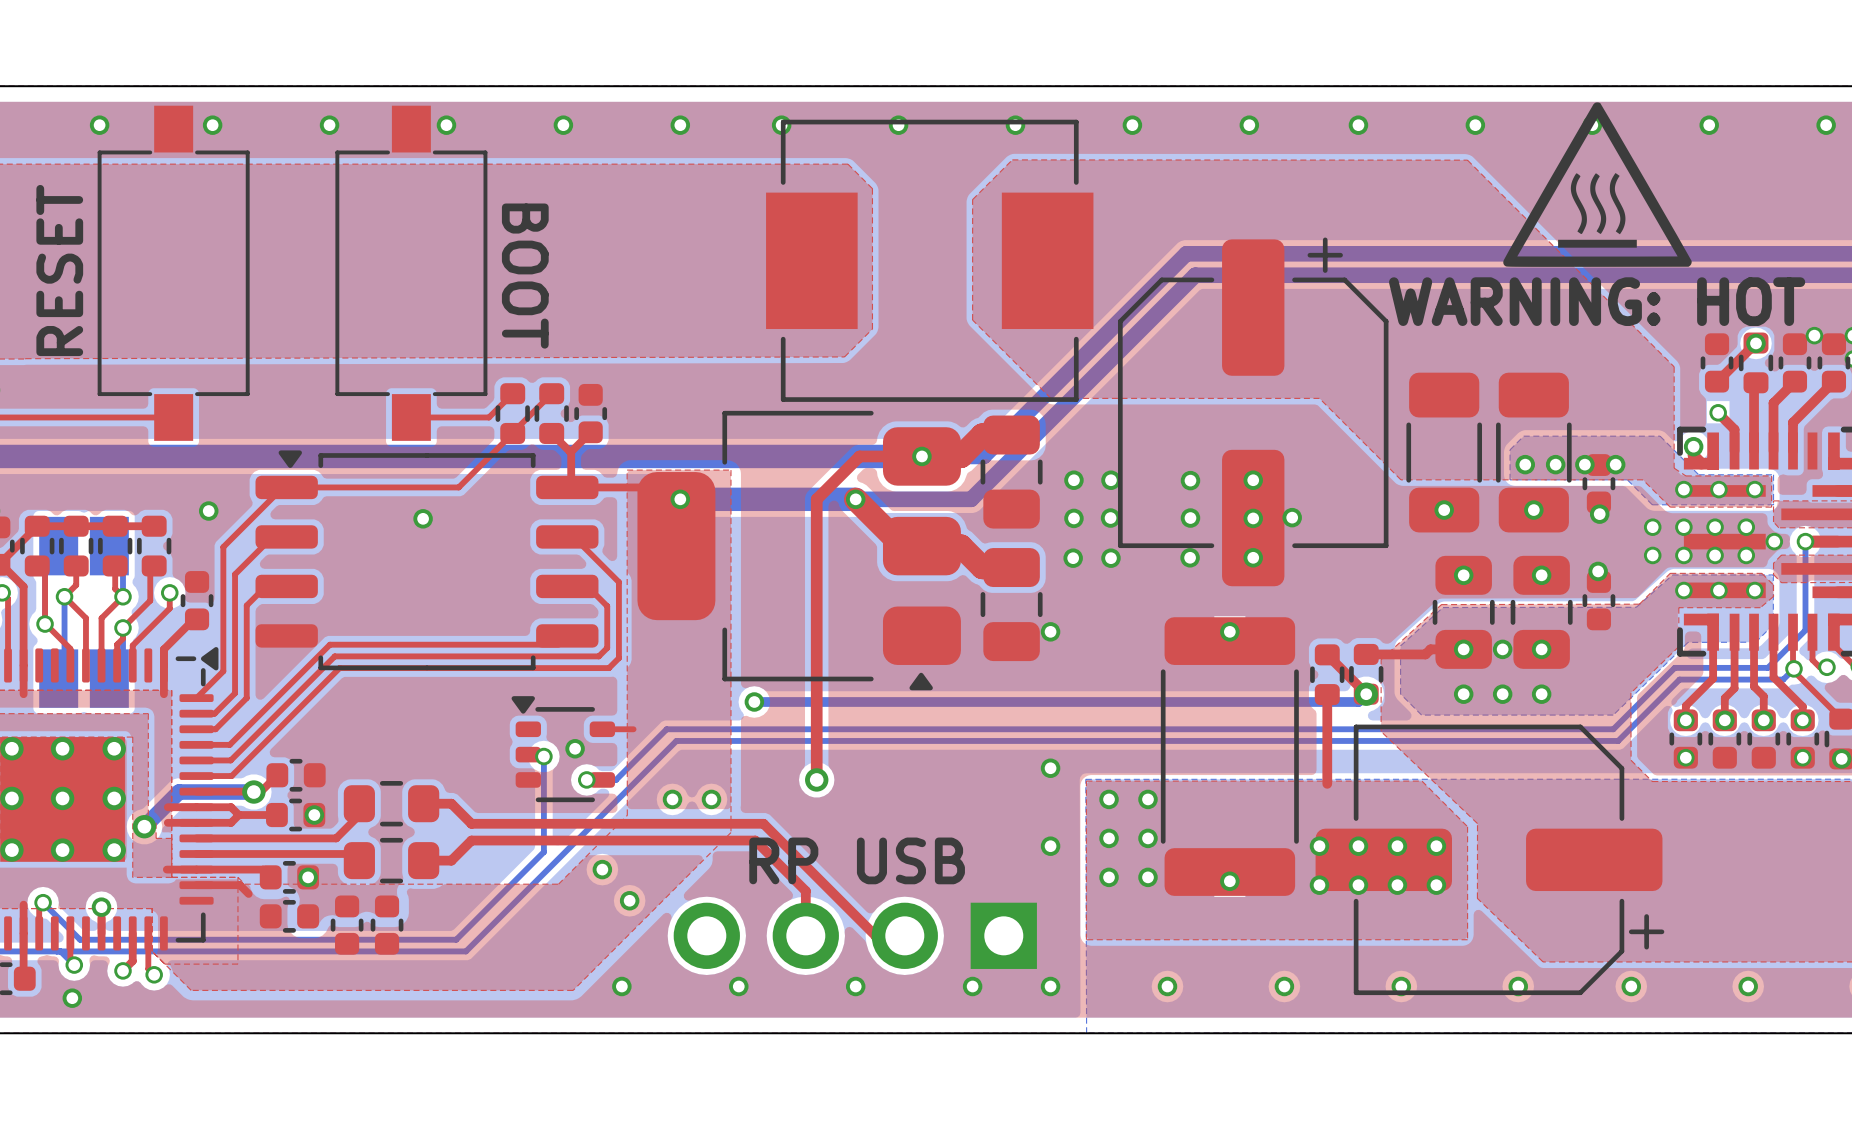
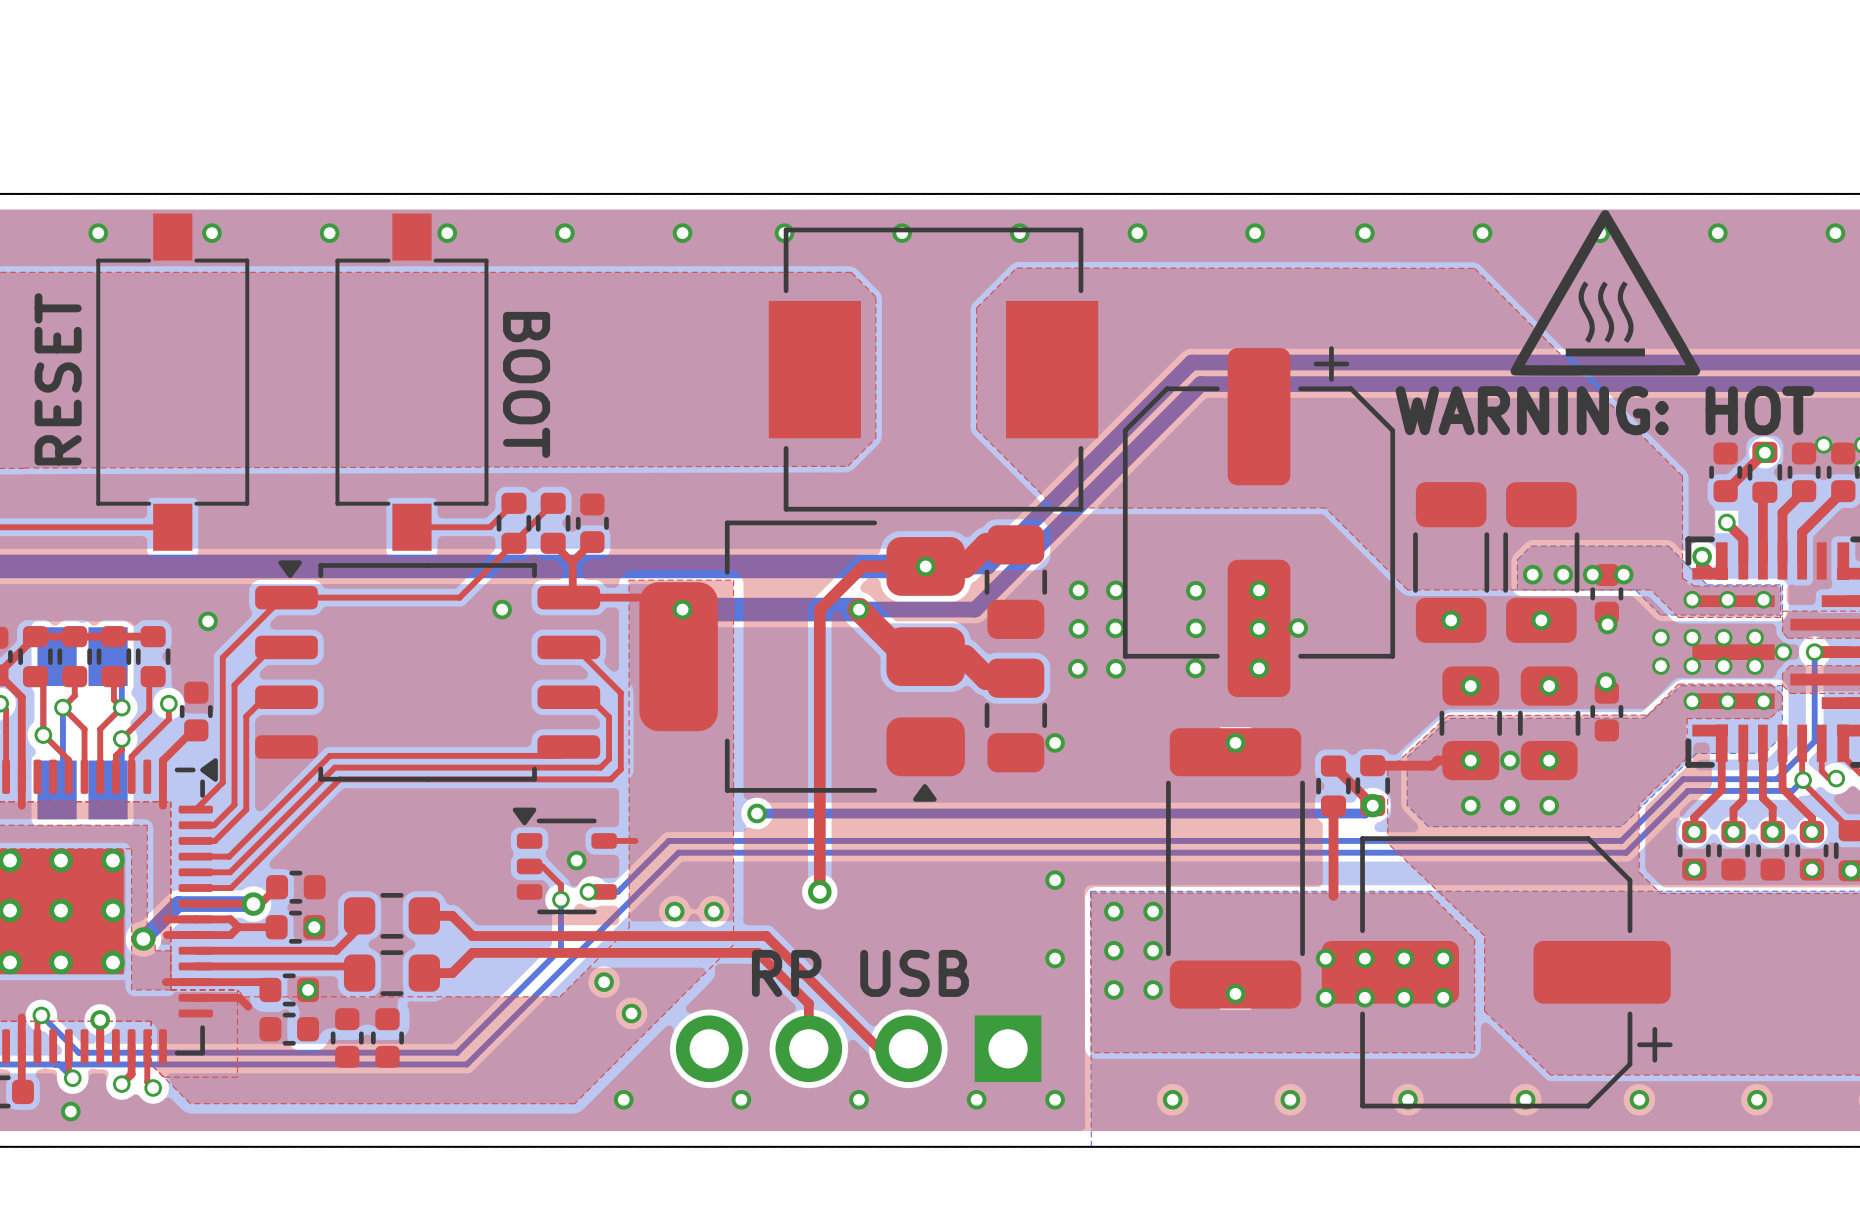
via position: (423, 518) -> (502, 609)
top track: none -> (529, 866) (542, 866) (560, 885) (560, 899)
bottom track: (543, 756) (543, 852) -> (560, 899) (560, 948) (545, 964)
via position: (543, 756) -> (560, 899)

